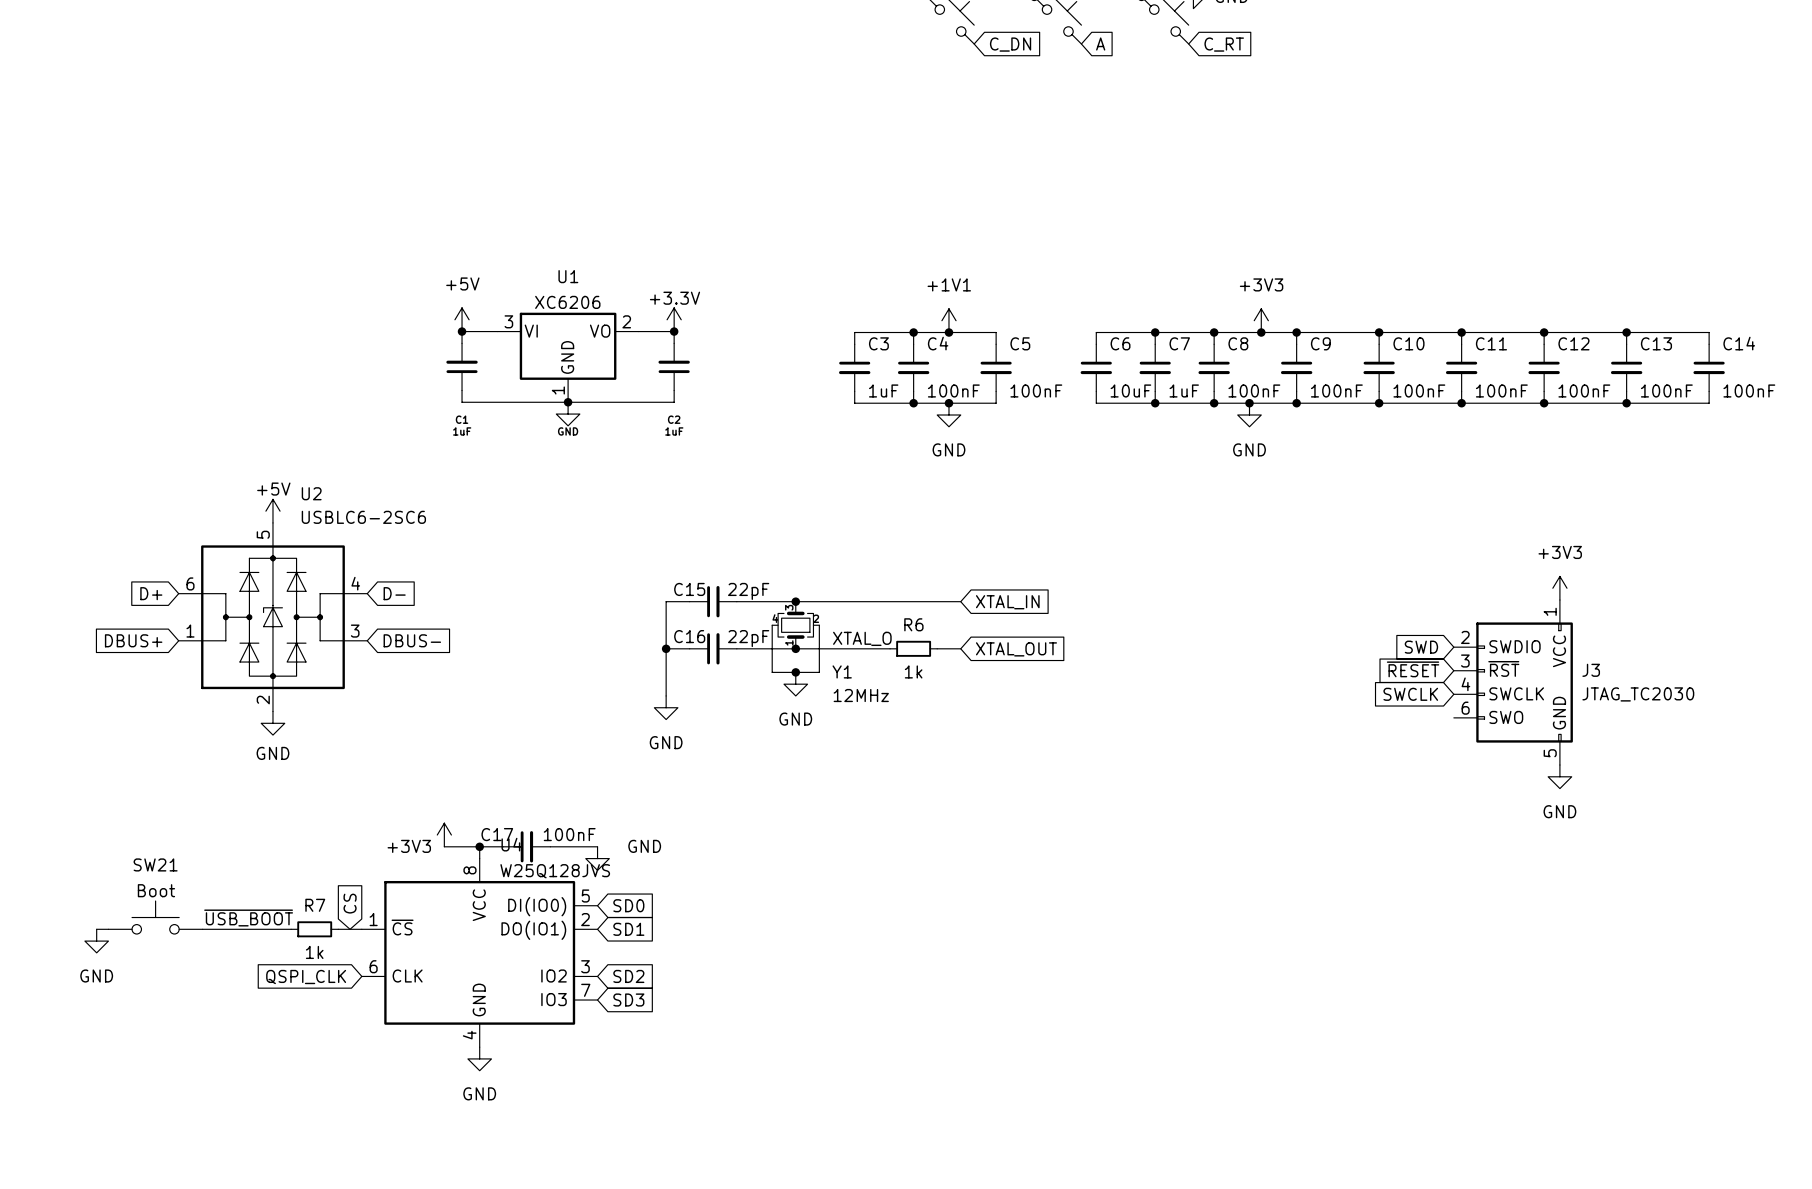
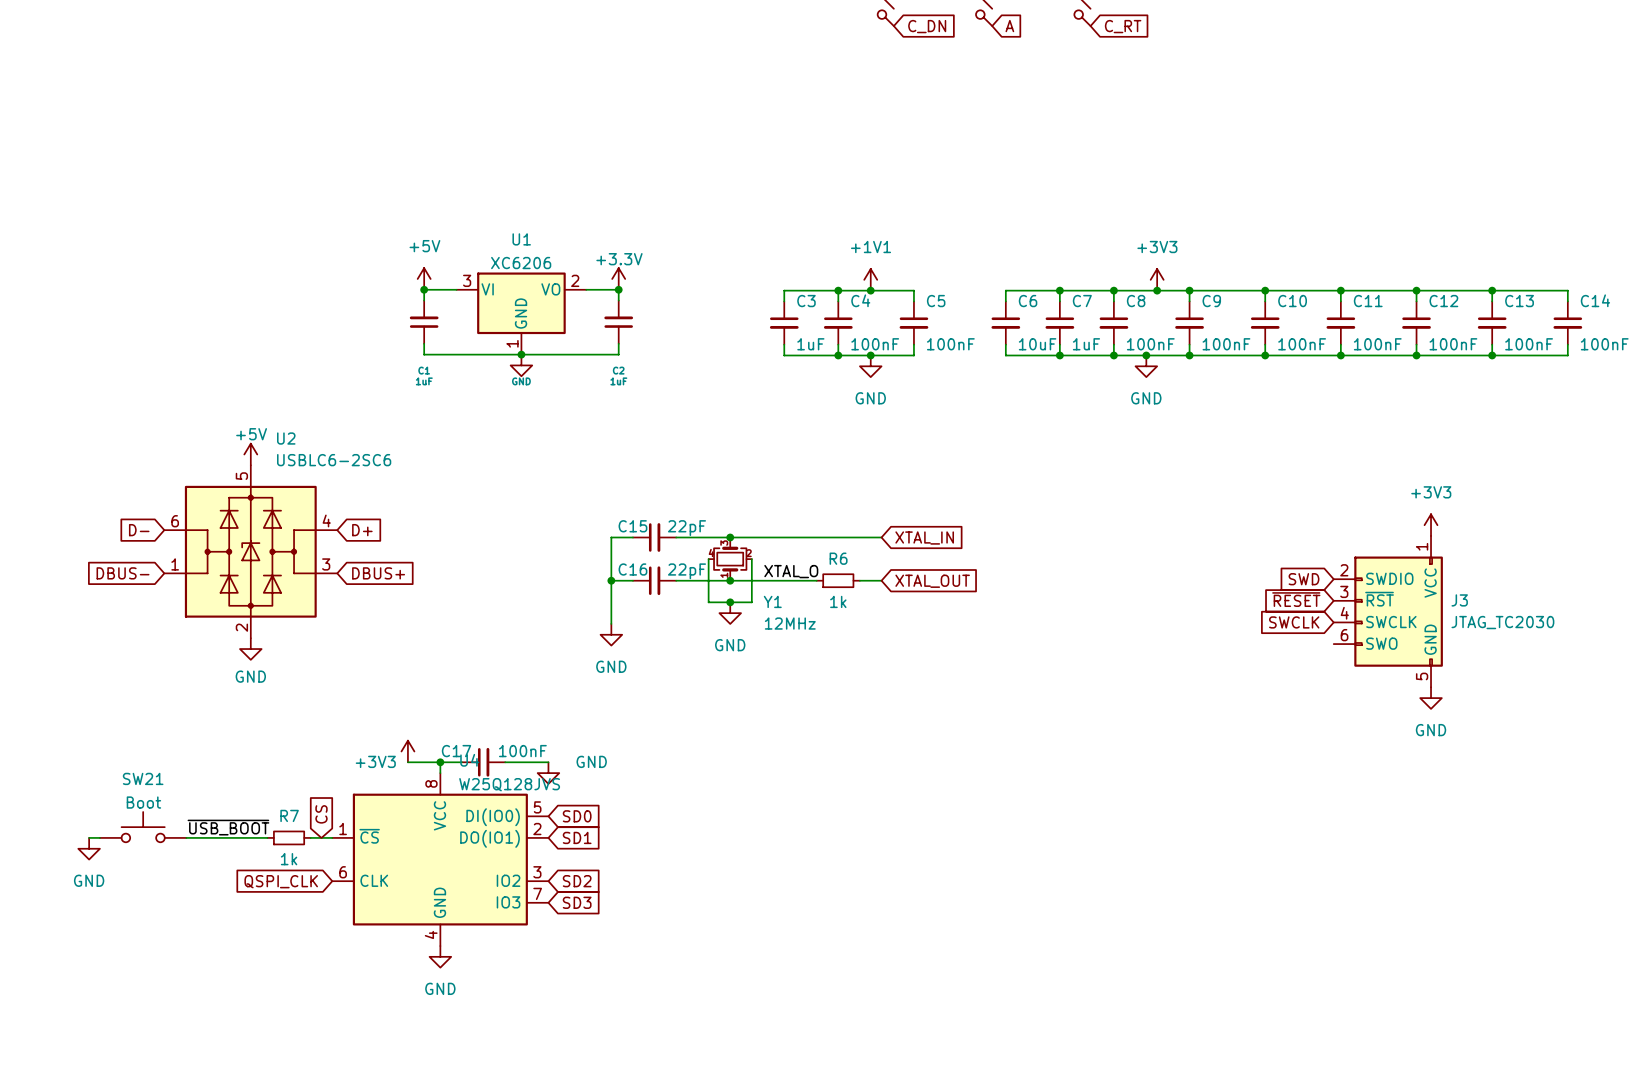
global label: D+ (151, 593) -> D- (139, 530)
global label: D- (394, 593) -> D+ (362, 530)
global label: DBUS+ (133, 640) -> DBUS- (123, 573)
global label: DBUS- (412, 640) -> DBUS+ (378, 573)

